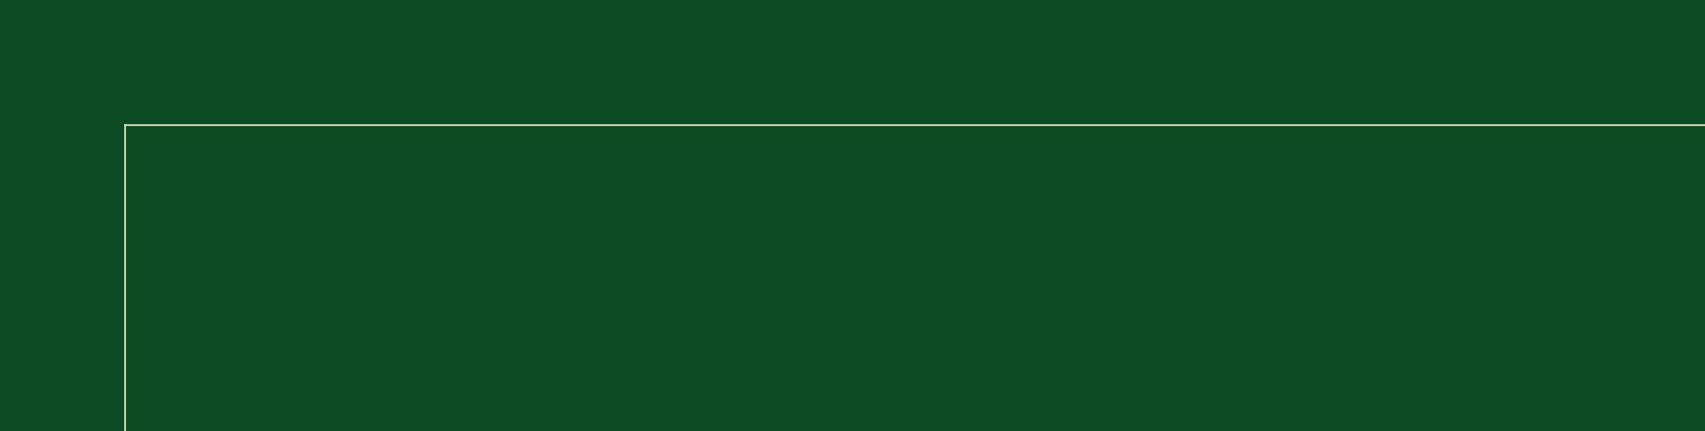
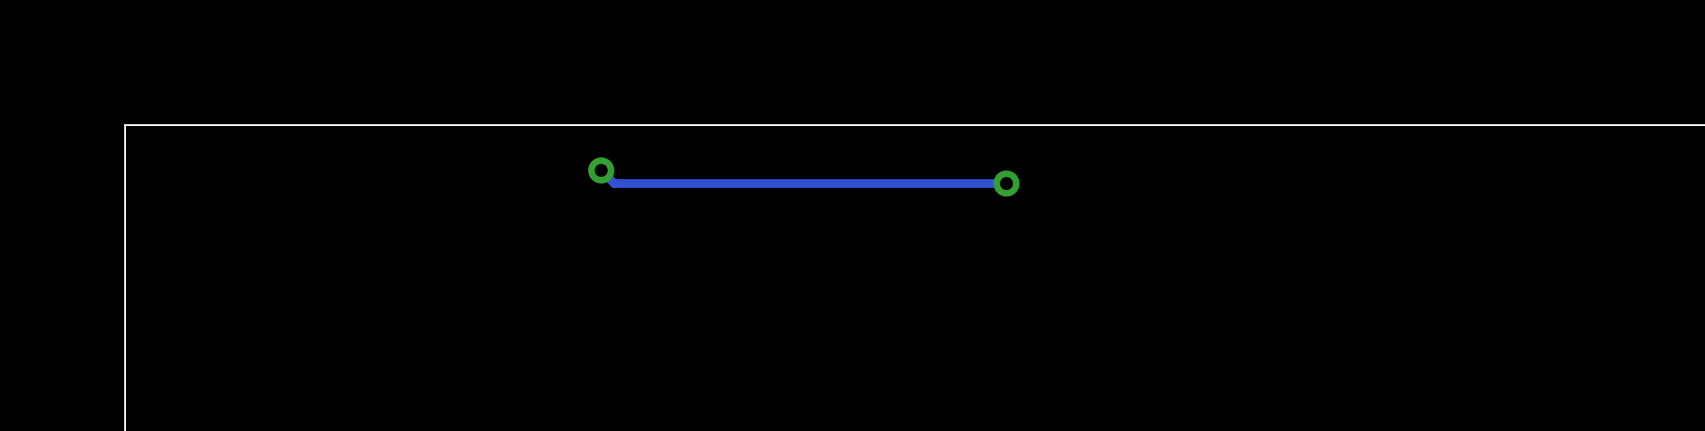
track: none -> (601, 170) (614, 183) (1006, 183)
via: none -> (601, 170)
via: none -> (1006, 183)

